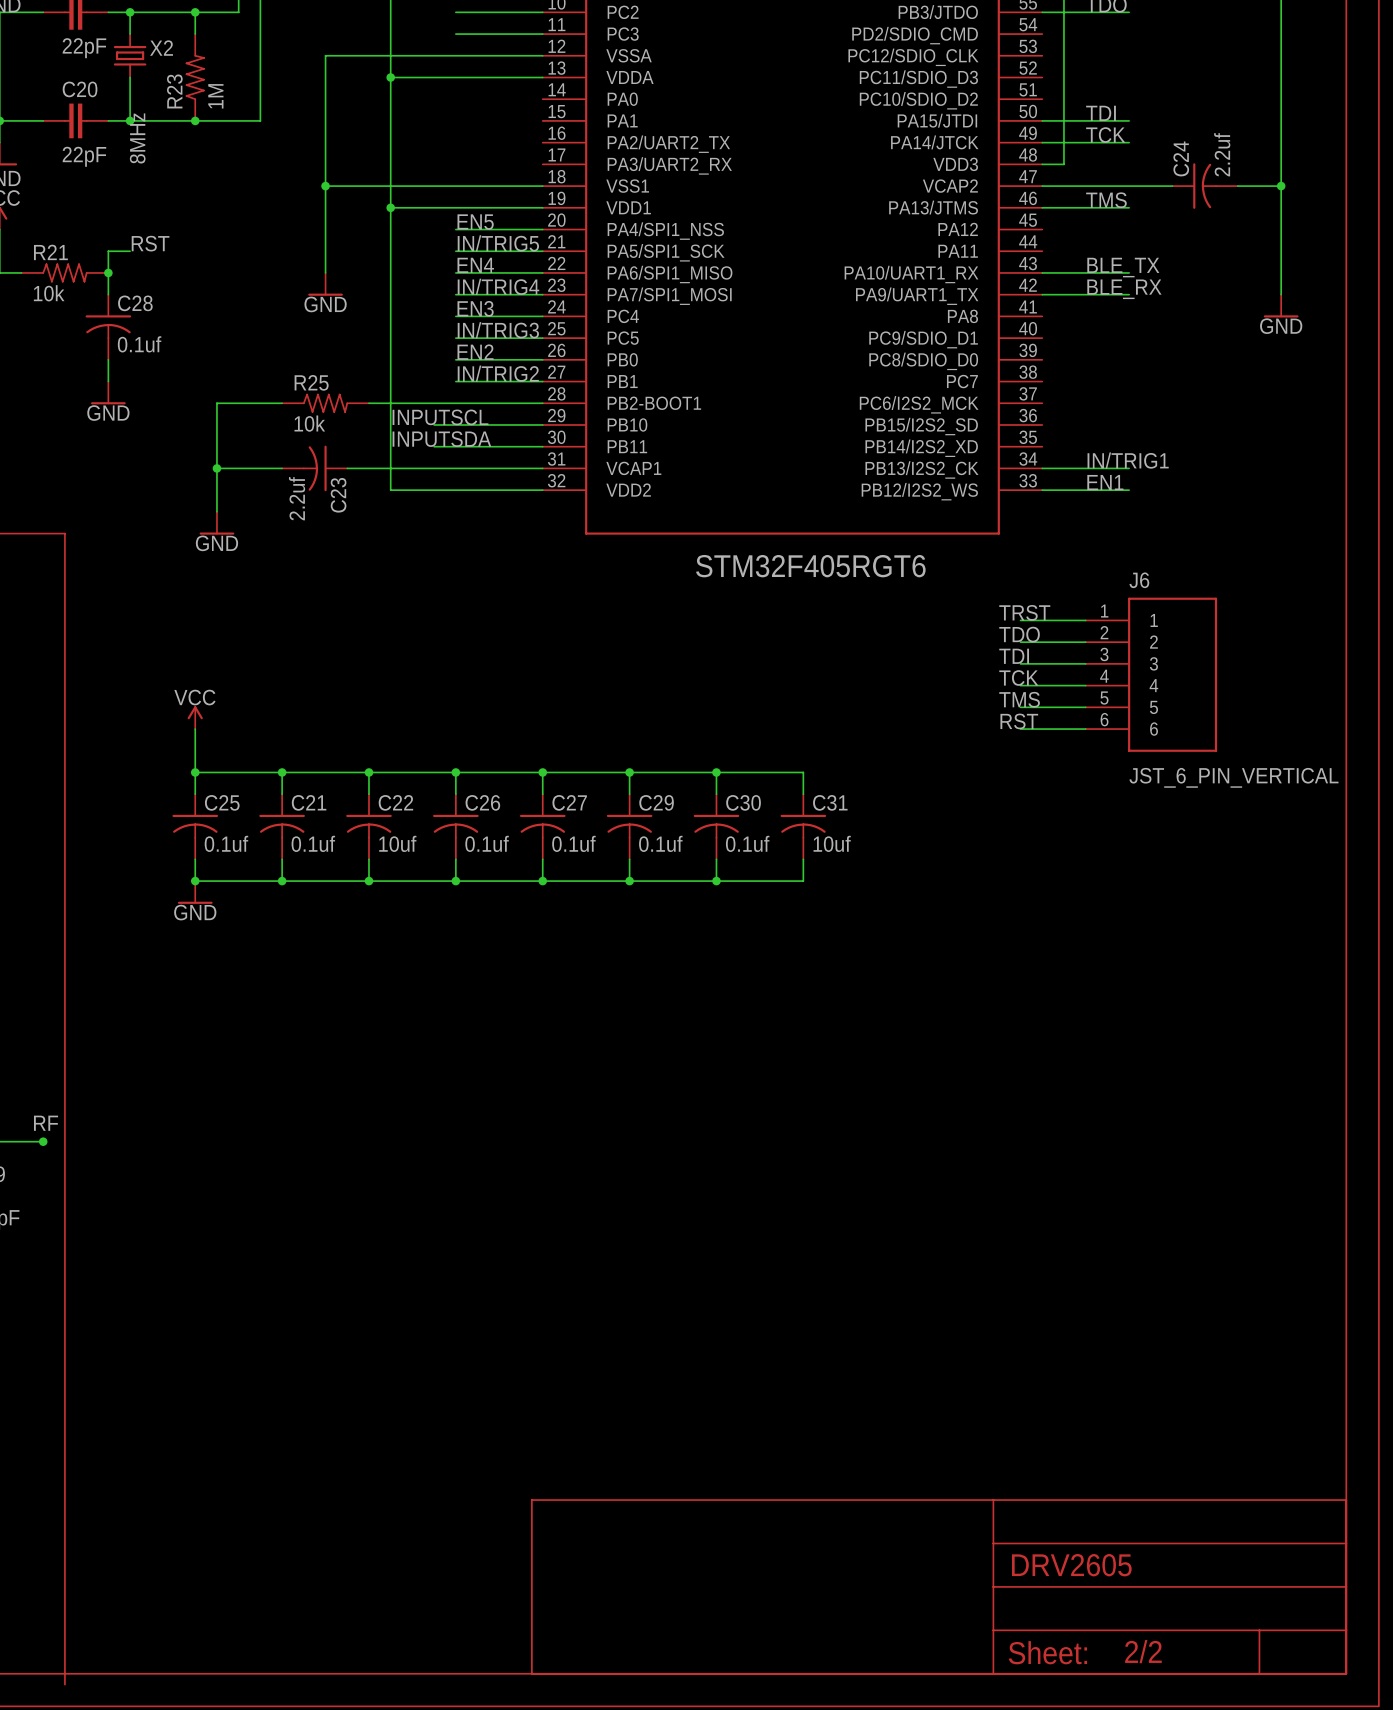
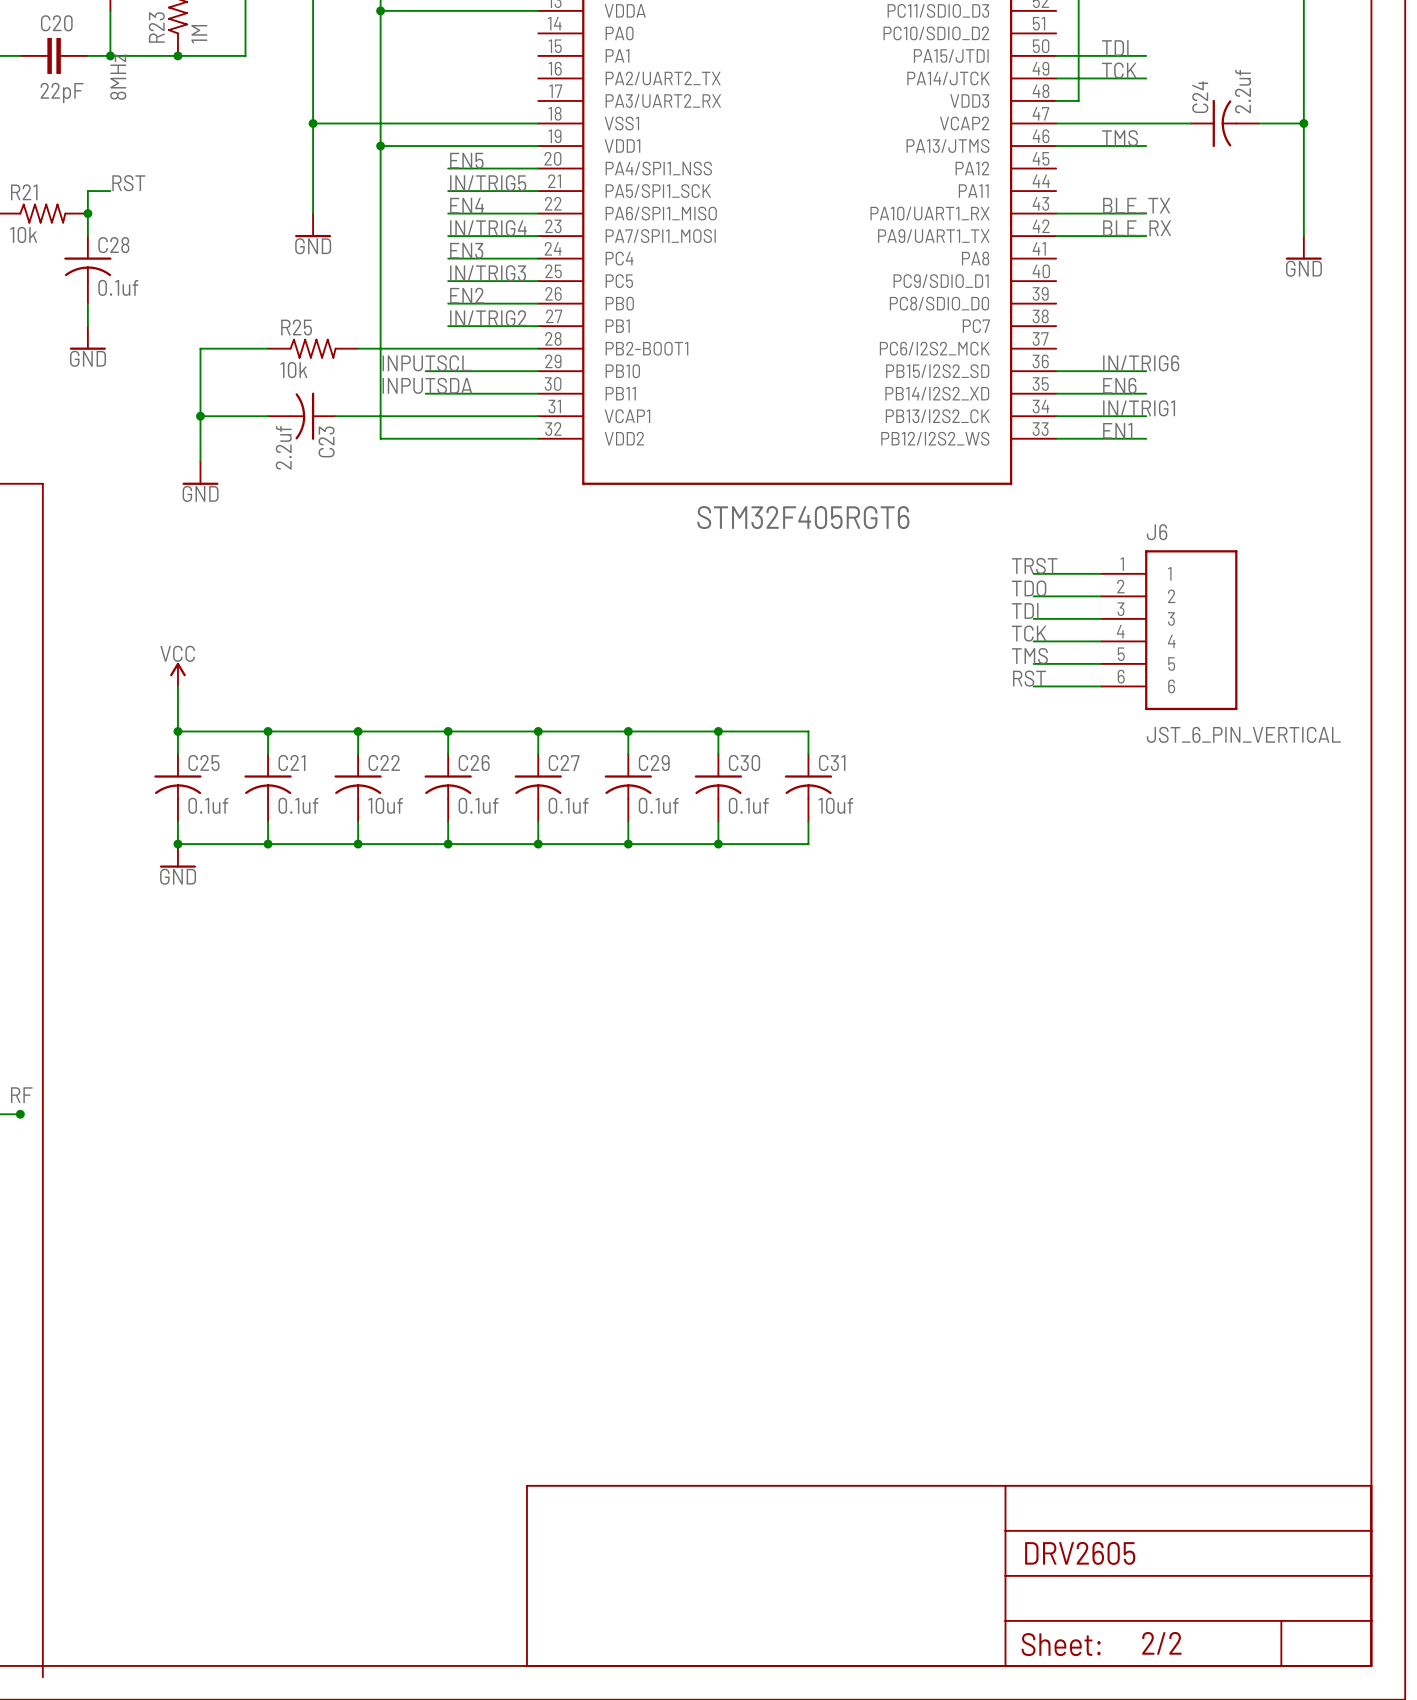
label: none -> IN/TRIG6 (1141, 363)
wire: none -> (1056, 371) (1146, 371)
label: none -> EN6 (1119, 385)
wire: none -> (1056, 393) (1146, 393)

